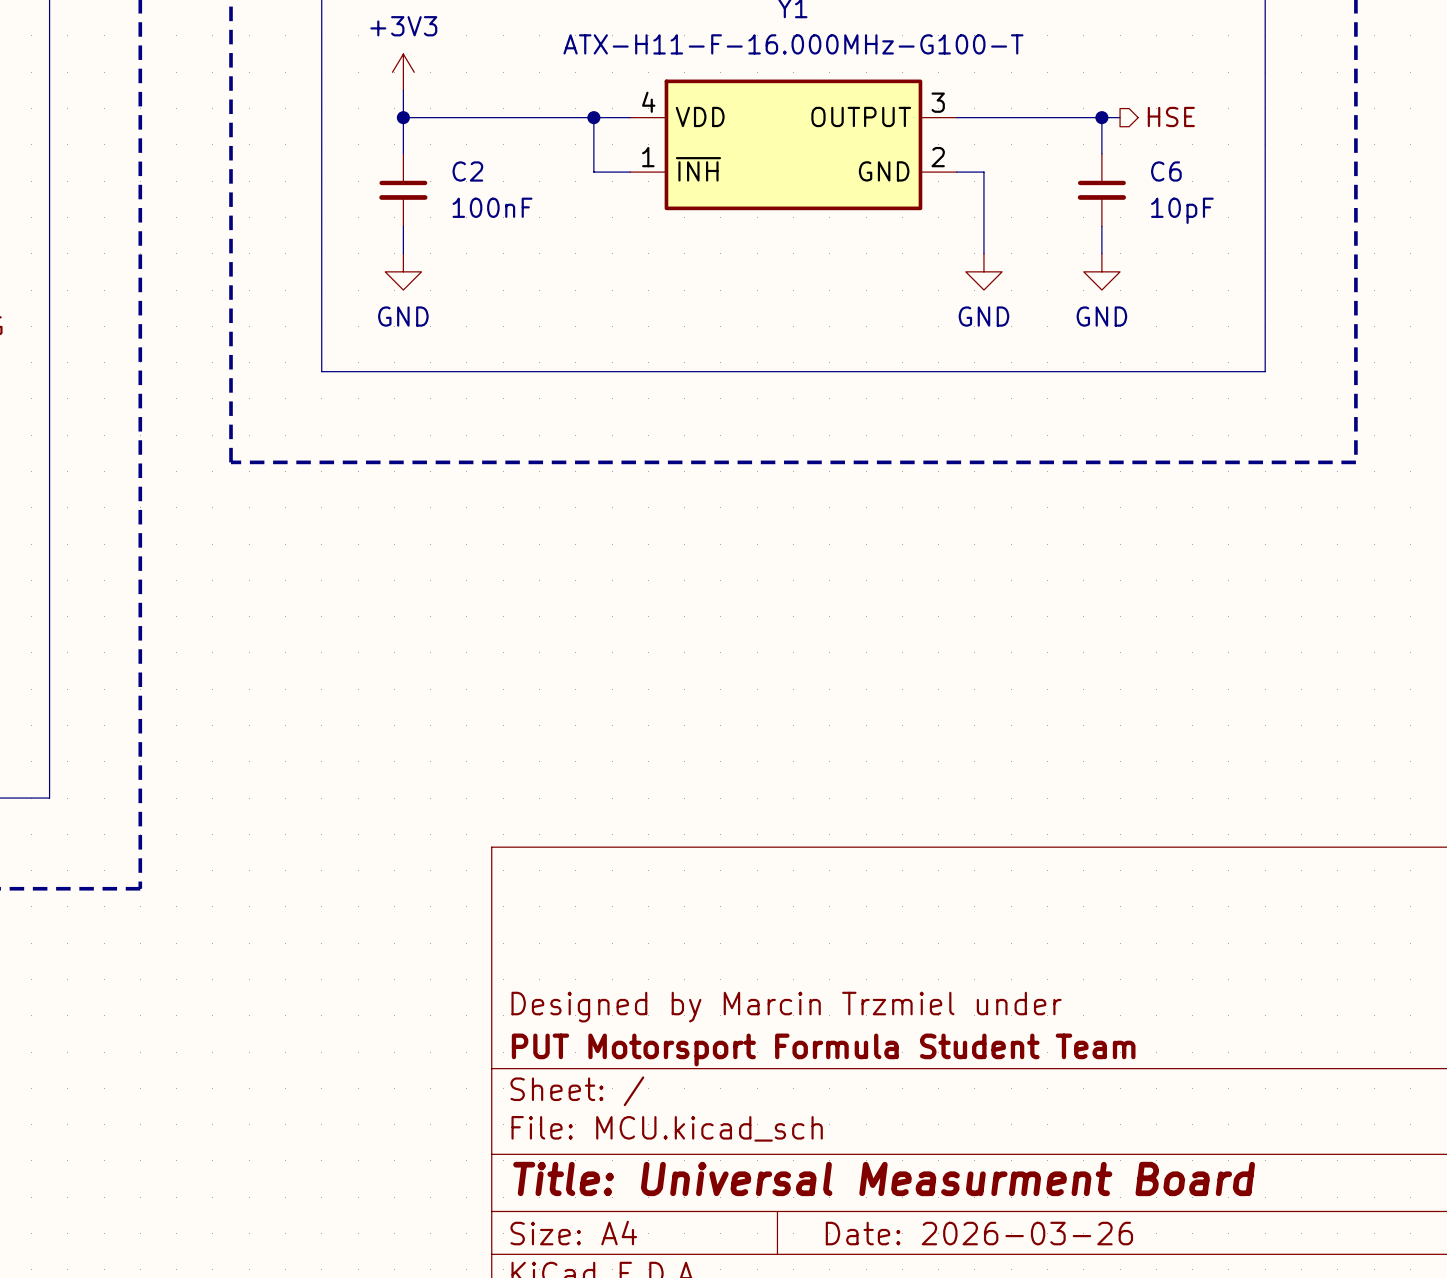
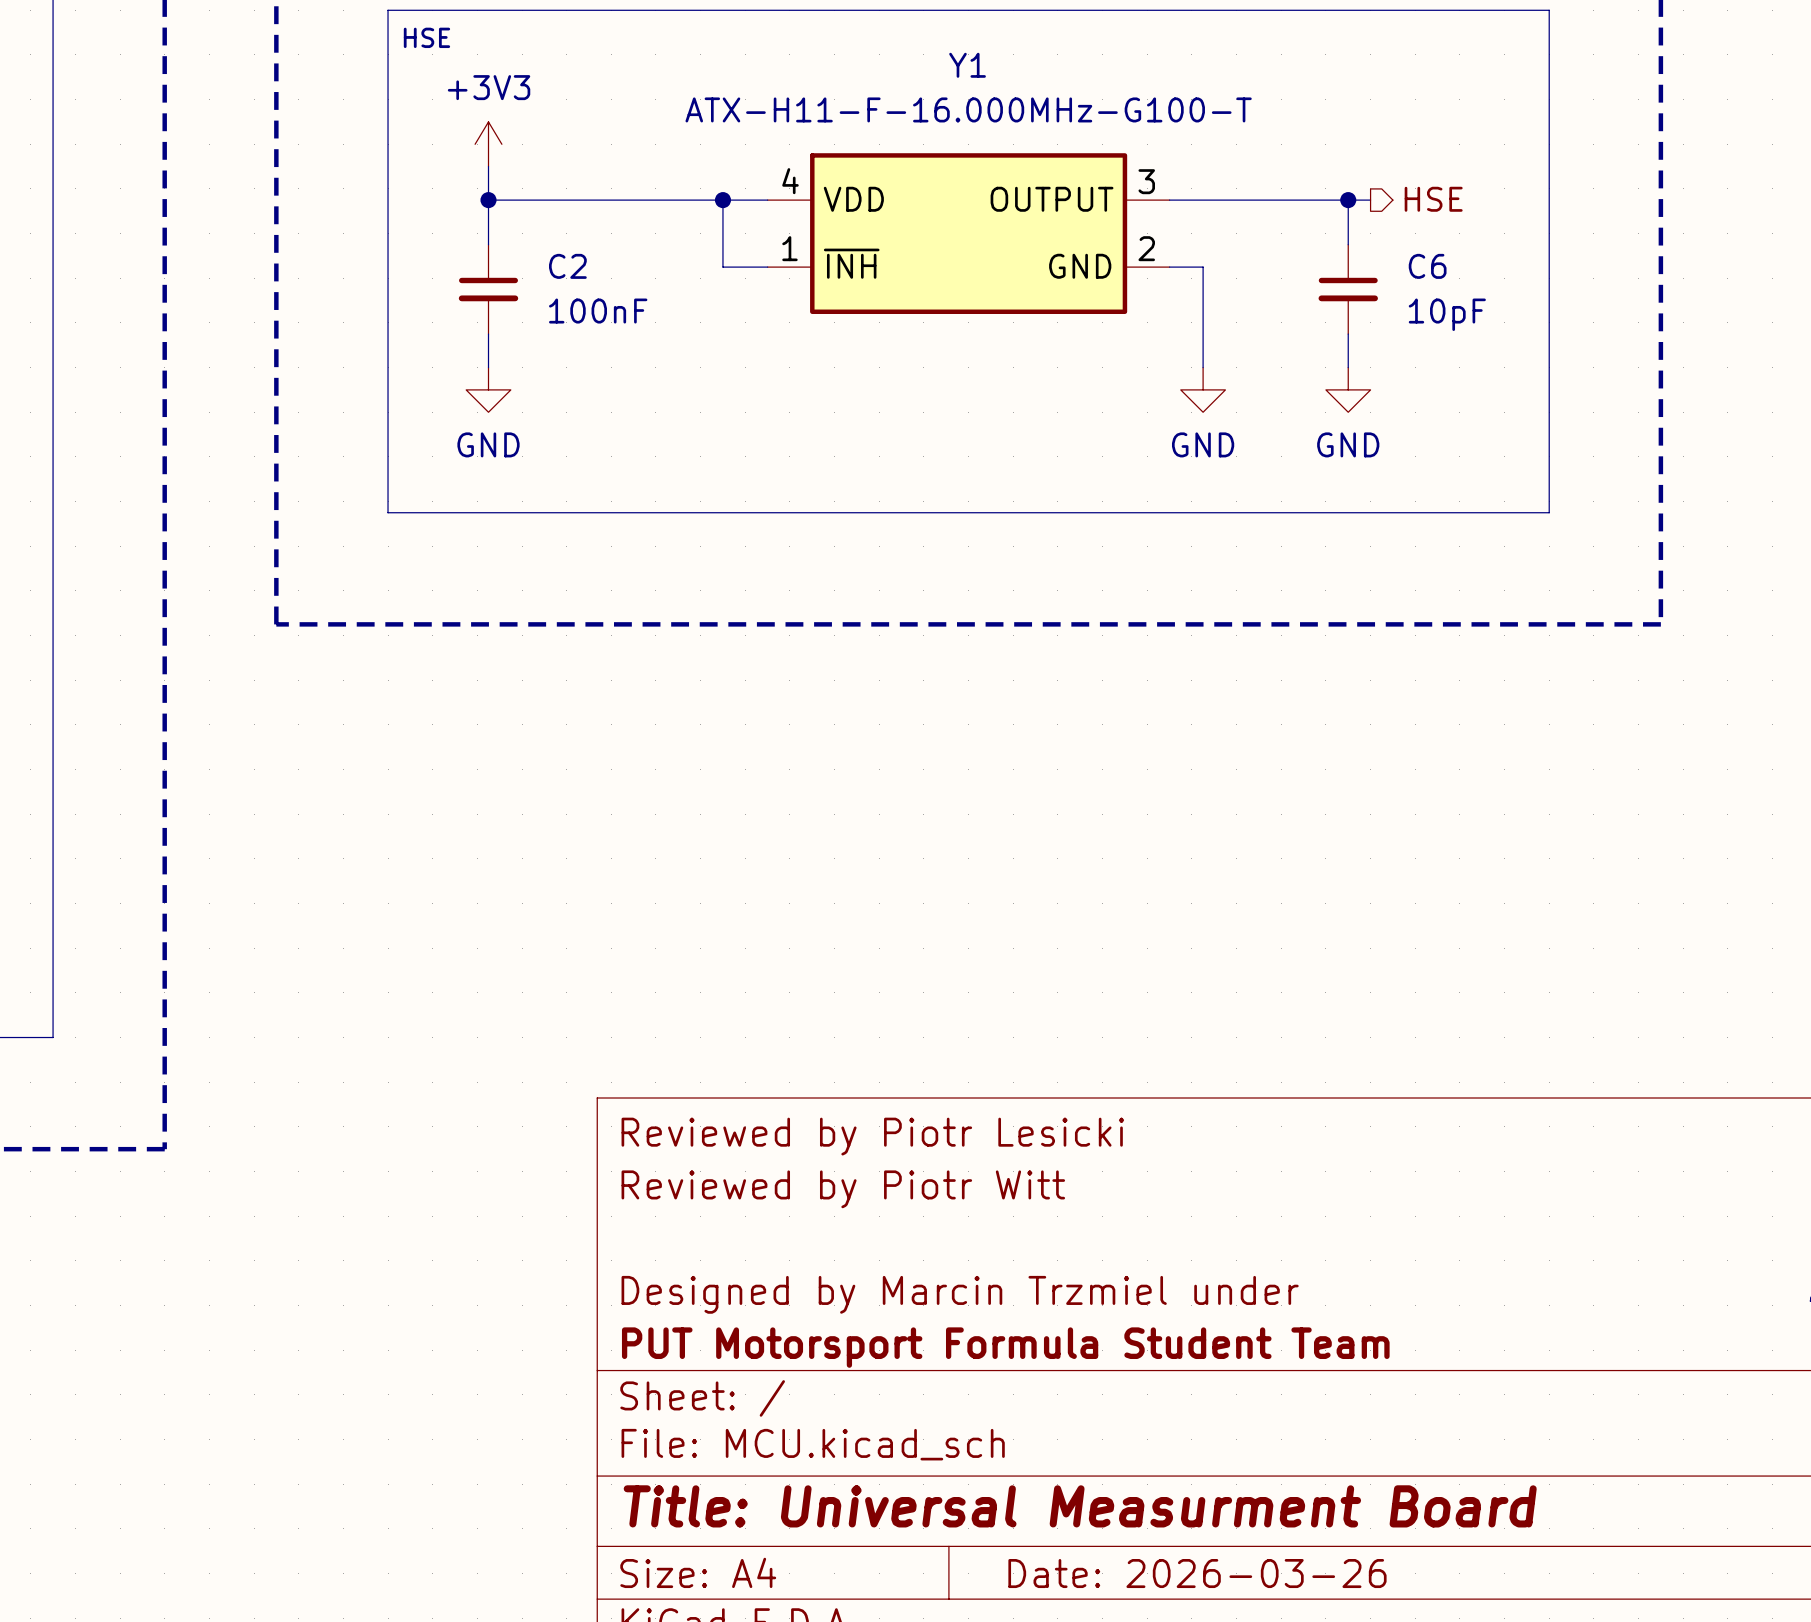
title block: none -> Reviewed by Piotr Lesicki (872, 1136)
title block: none -> Reviewed by Piotr Witt (843, 1189)

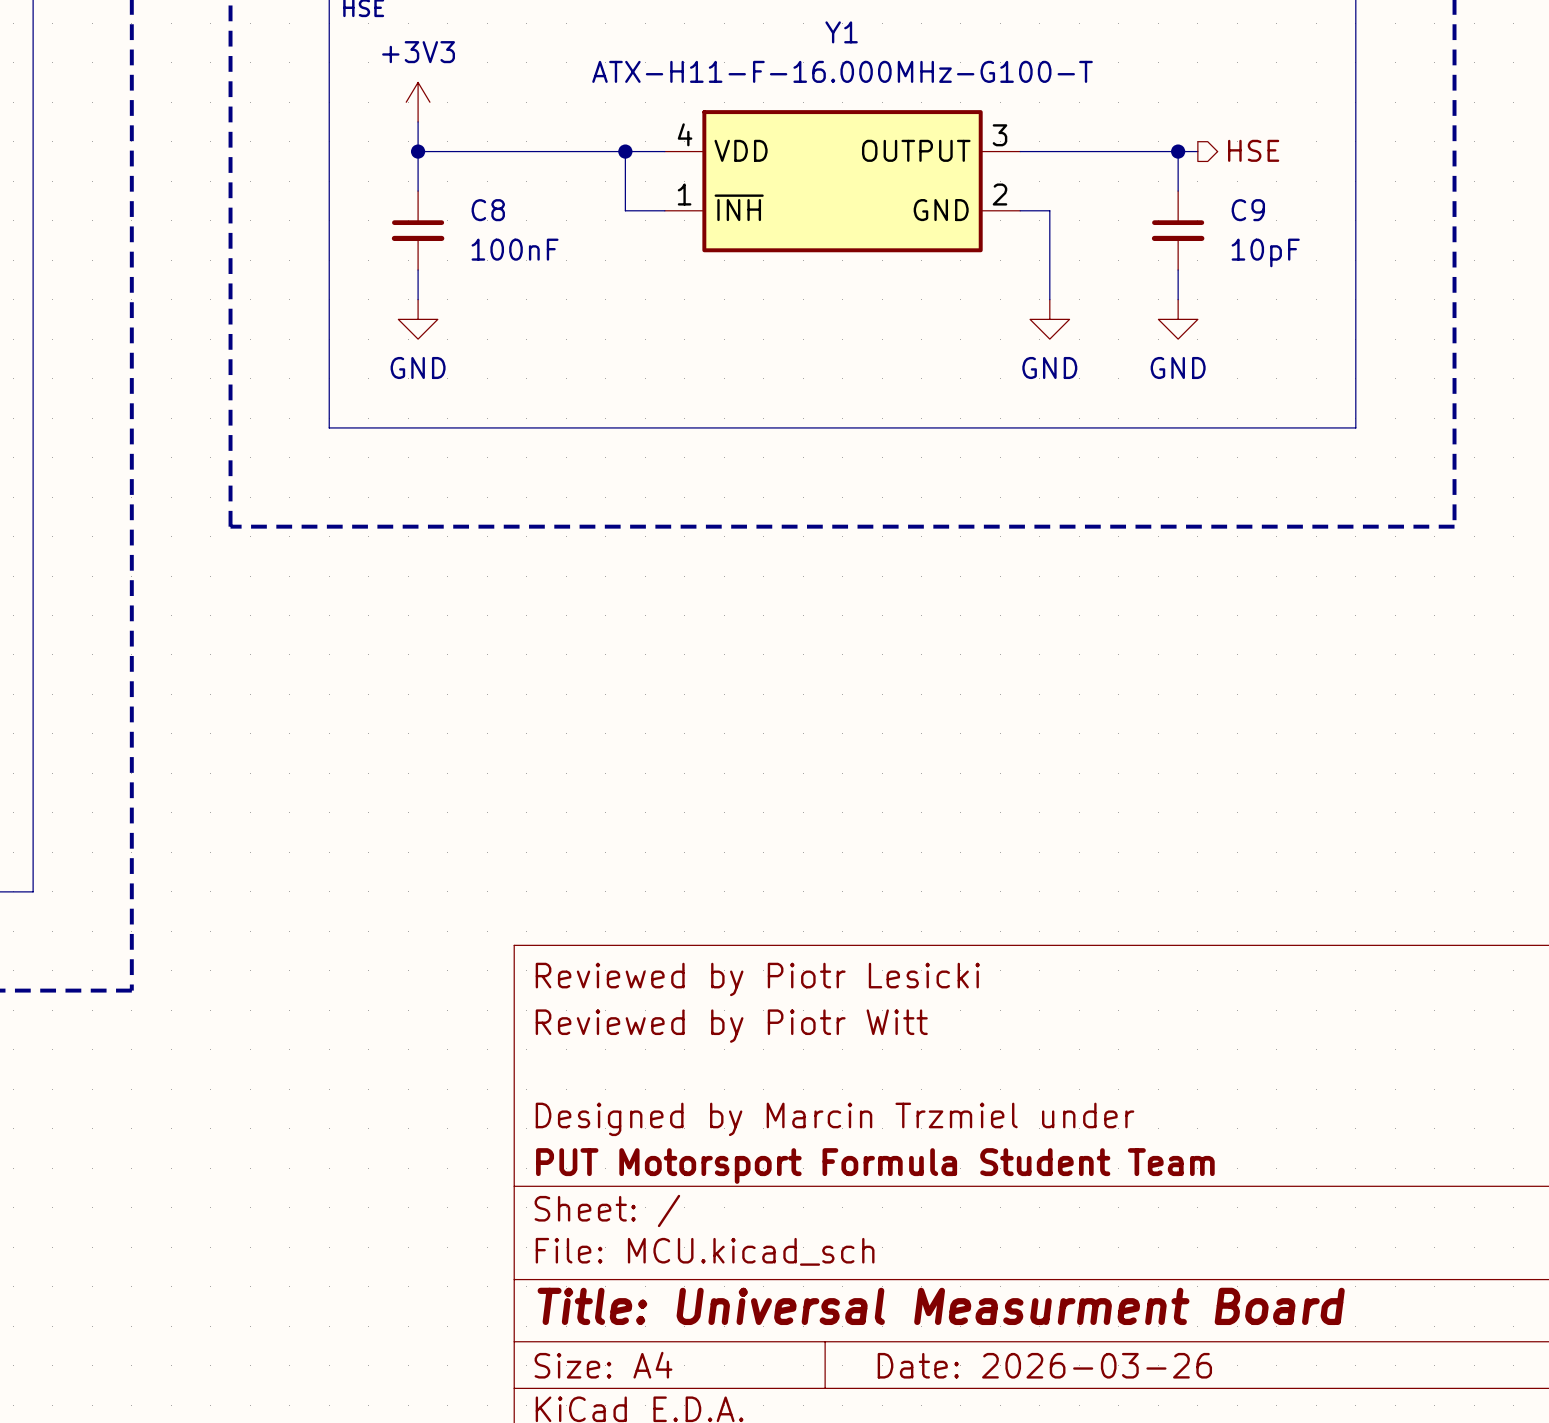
C2 name: C2 (567, 266) -> C8 (488, 210)
C6 name: C6 (1427, 266) -> C9 (1248, 210)

